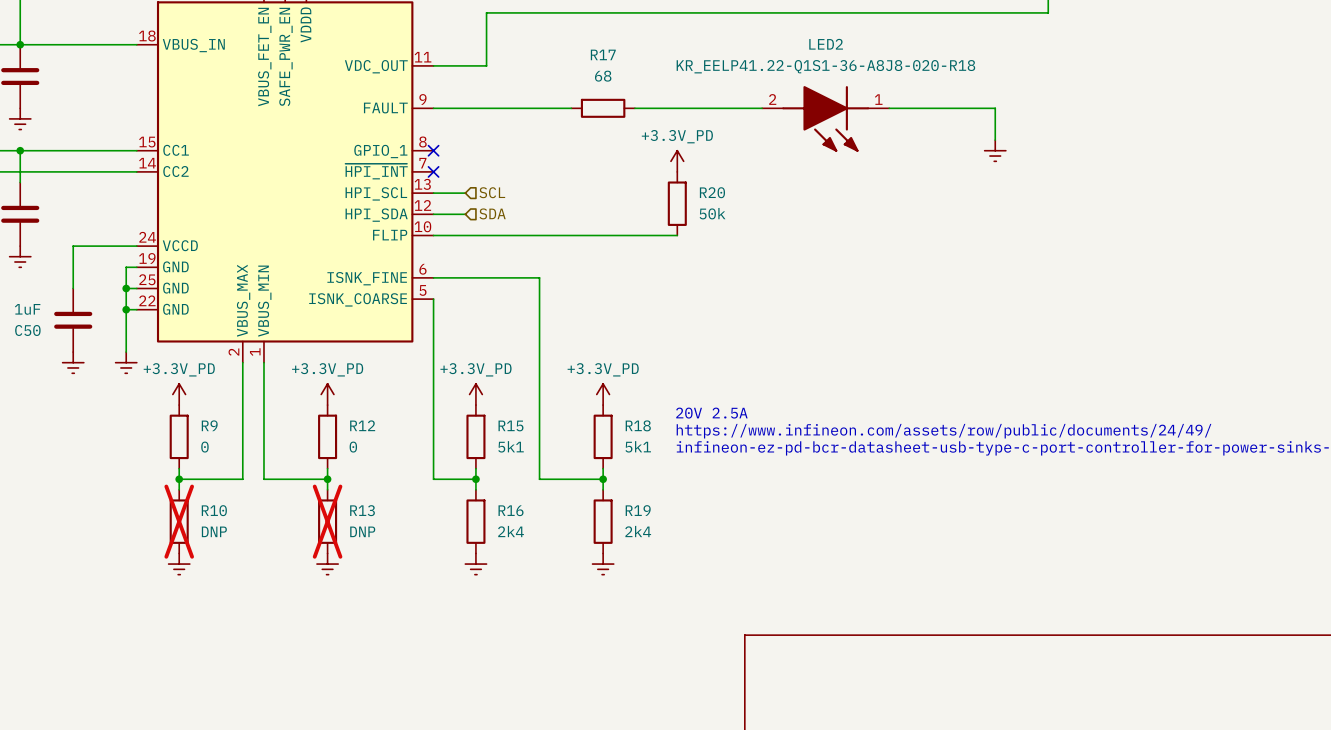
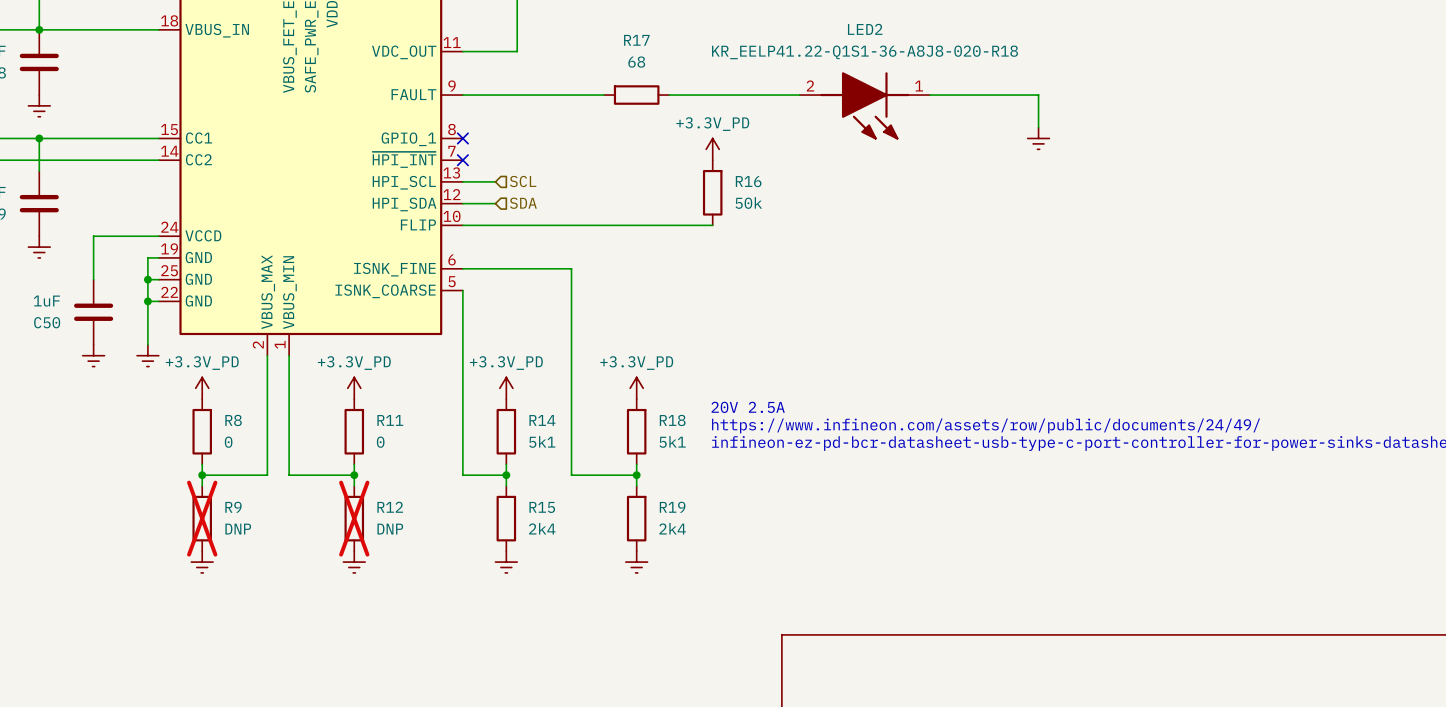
R20 name: R20 (712, 192) -> R16 (748, 181)
R9 name: R9 (209, 425) -> R8 (233, 420)
R12 name: R12 (362, 425) -> R11 (390, 420)
R15 name: R15 (510, 425) -> R14 (542, 420)
R10 name: R10 (214, 510) -> R9 (233, 507)
R13 name: R13 (362, 510) -> R12 (390, 507)
R16 name: R16 (511, 510) -> R15 (542, 507)

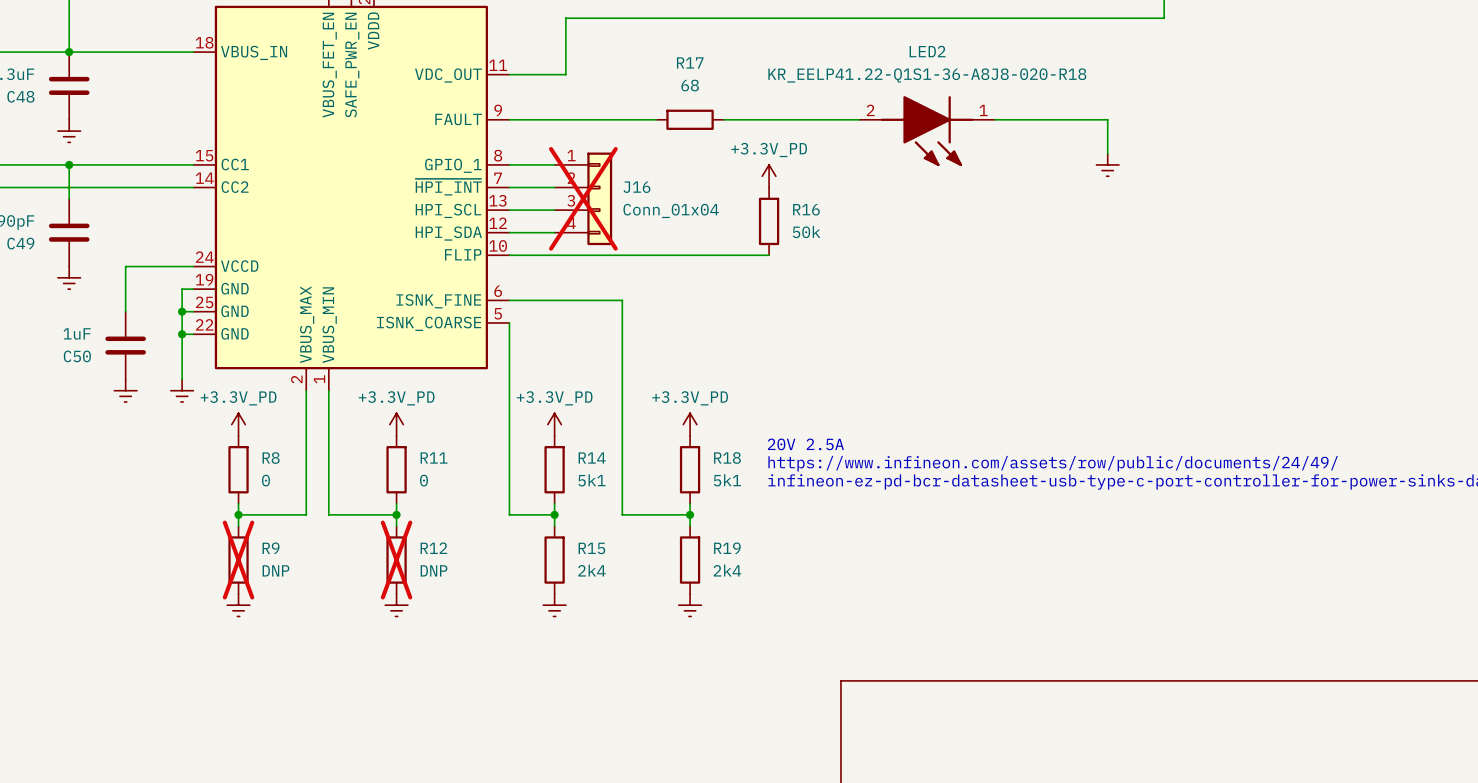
wire: none -> (509, 164) (554, 164)
no-connect mark: (462, 138) -> none
wire: none -> (509, 187) (554, 187)
no-connect mark: (462, 160) -> none
J16: none -> Conn_01x04 (583, 198)
wire: none -> (543, 210) (554, 210)
hierarchical label: SCL (523, 181) -> none
wire: none -> (543, 232) (554, 232)
hierarchical label: SDA (523, 203) -> none

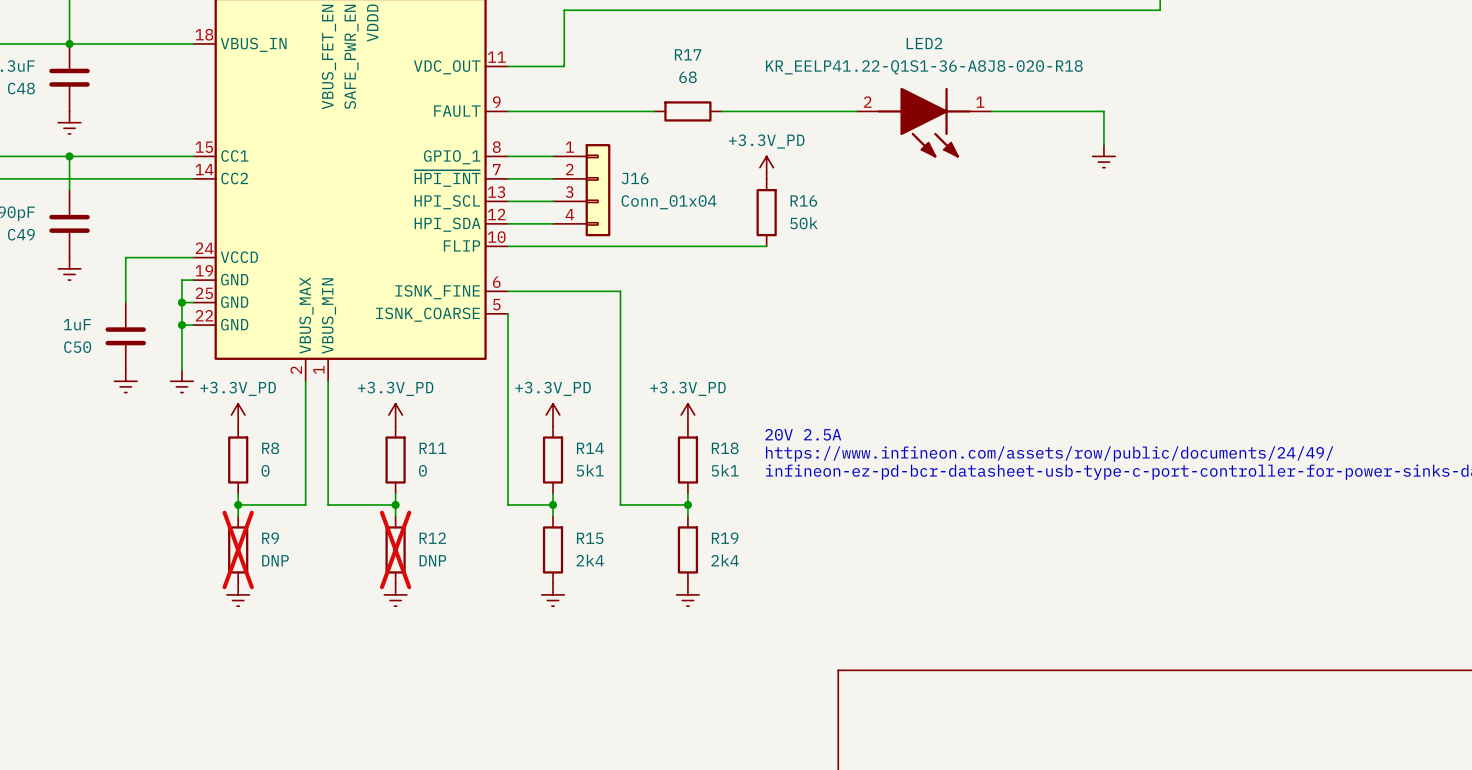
J16 do-not-place cross: (583, 198) -> none

